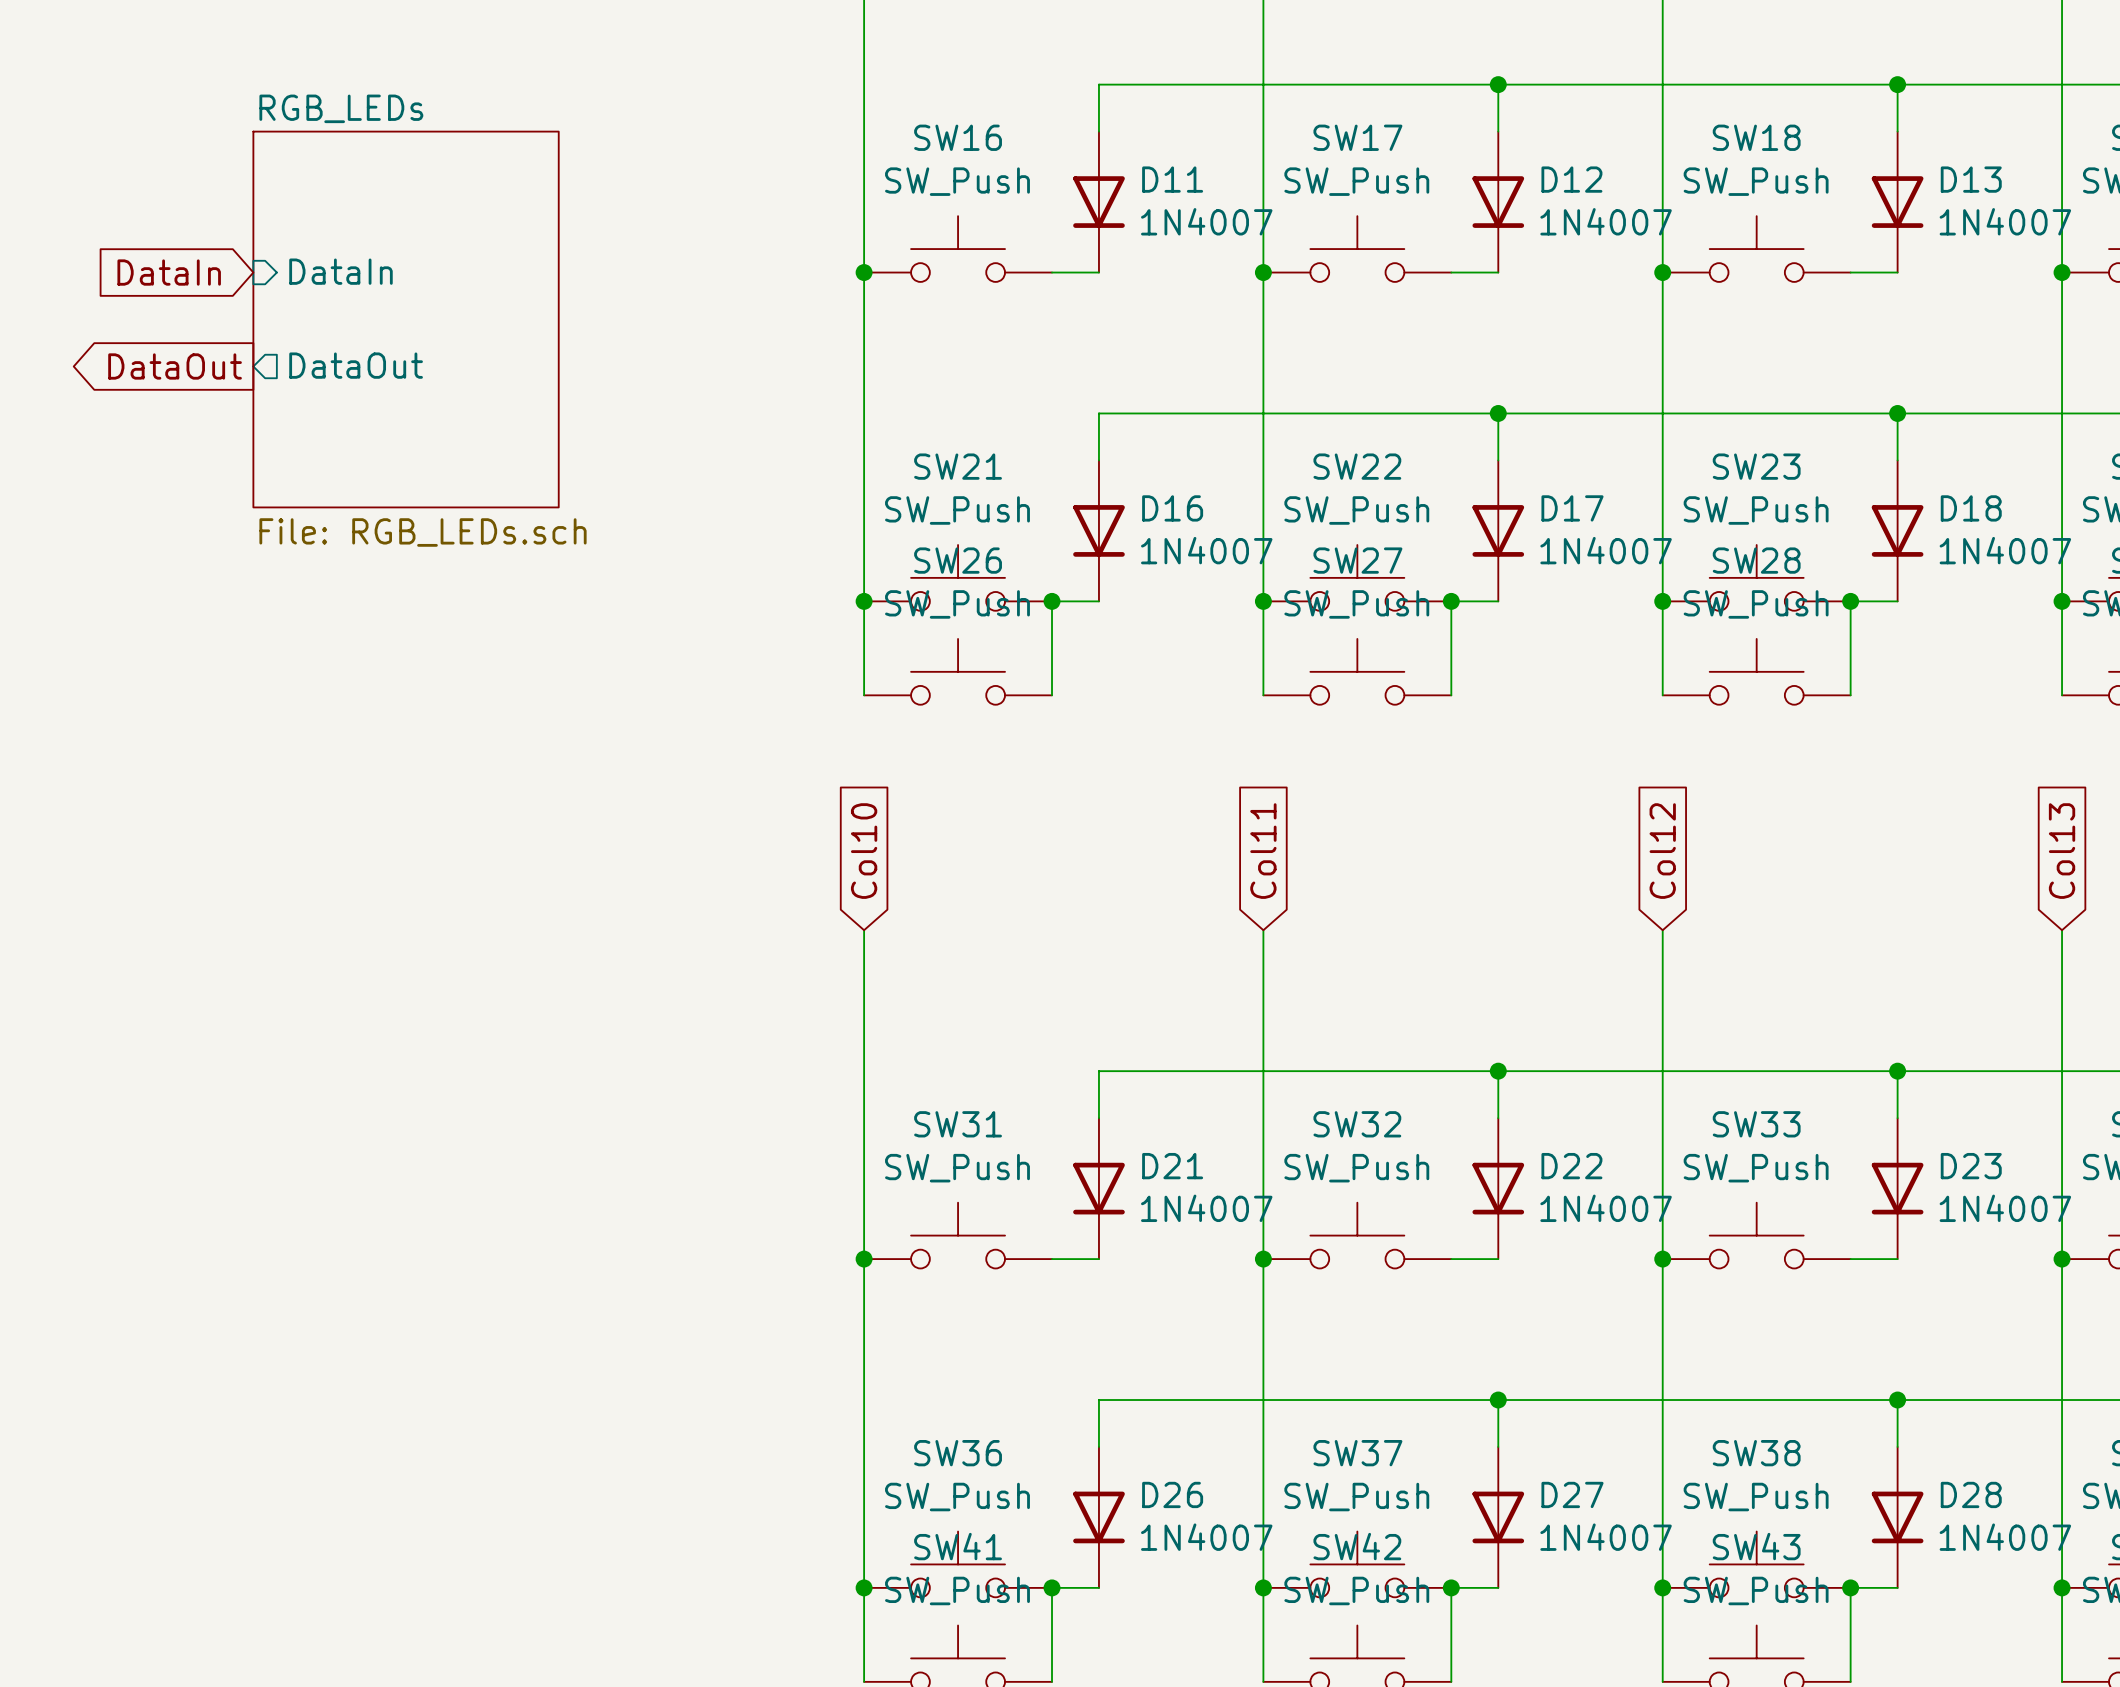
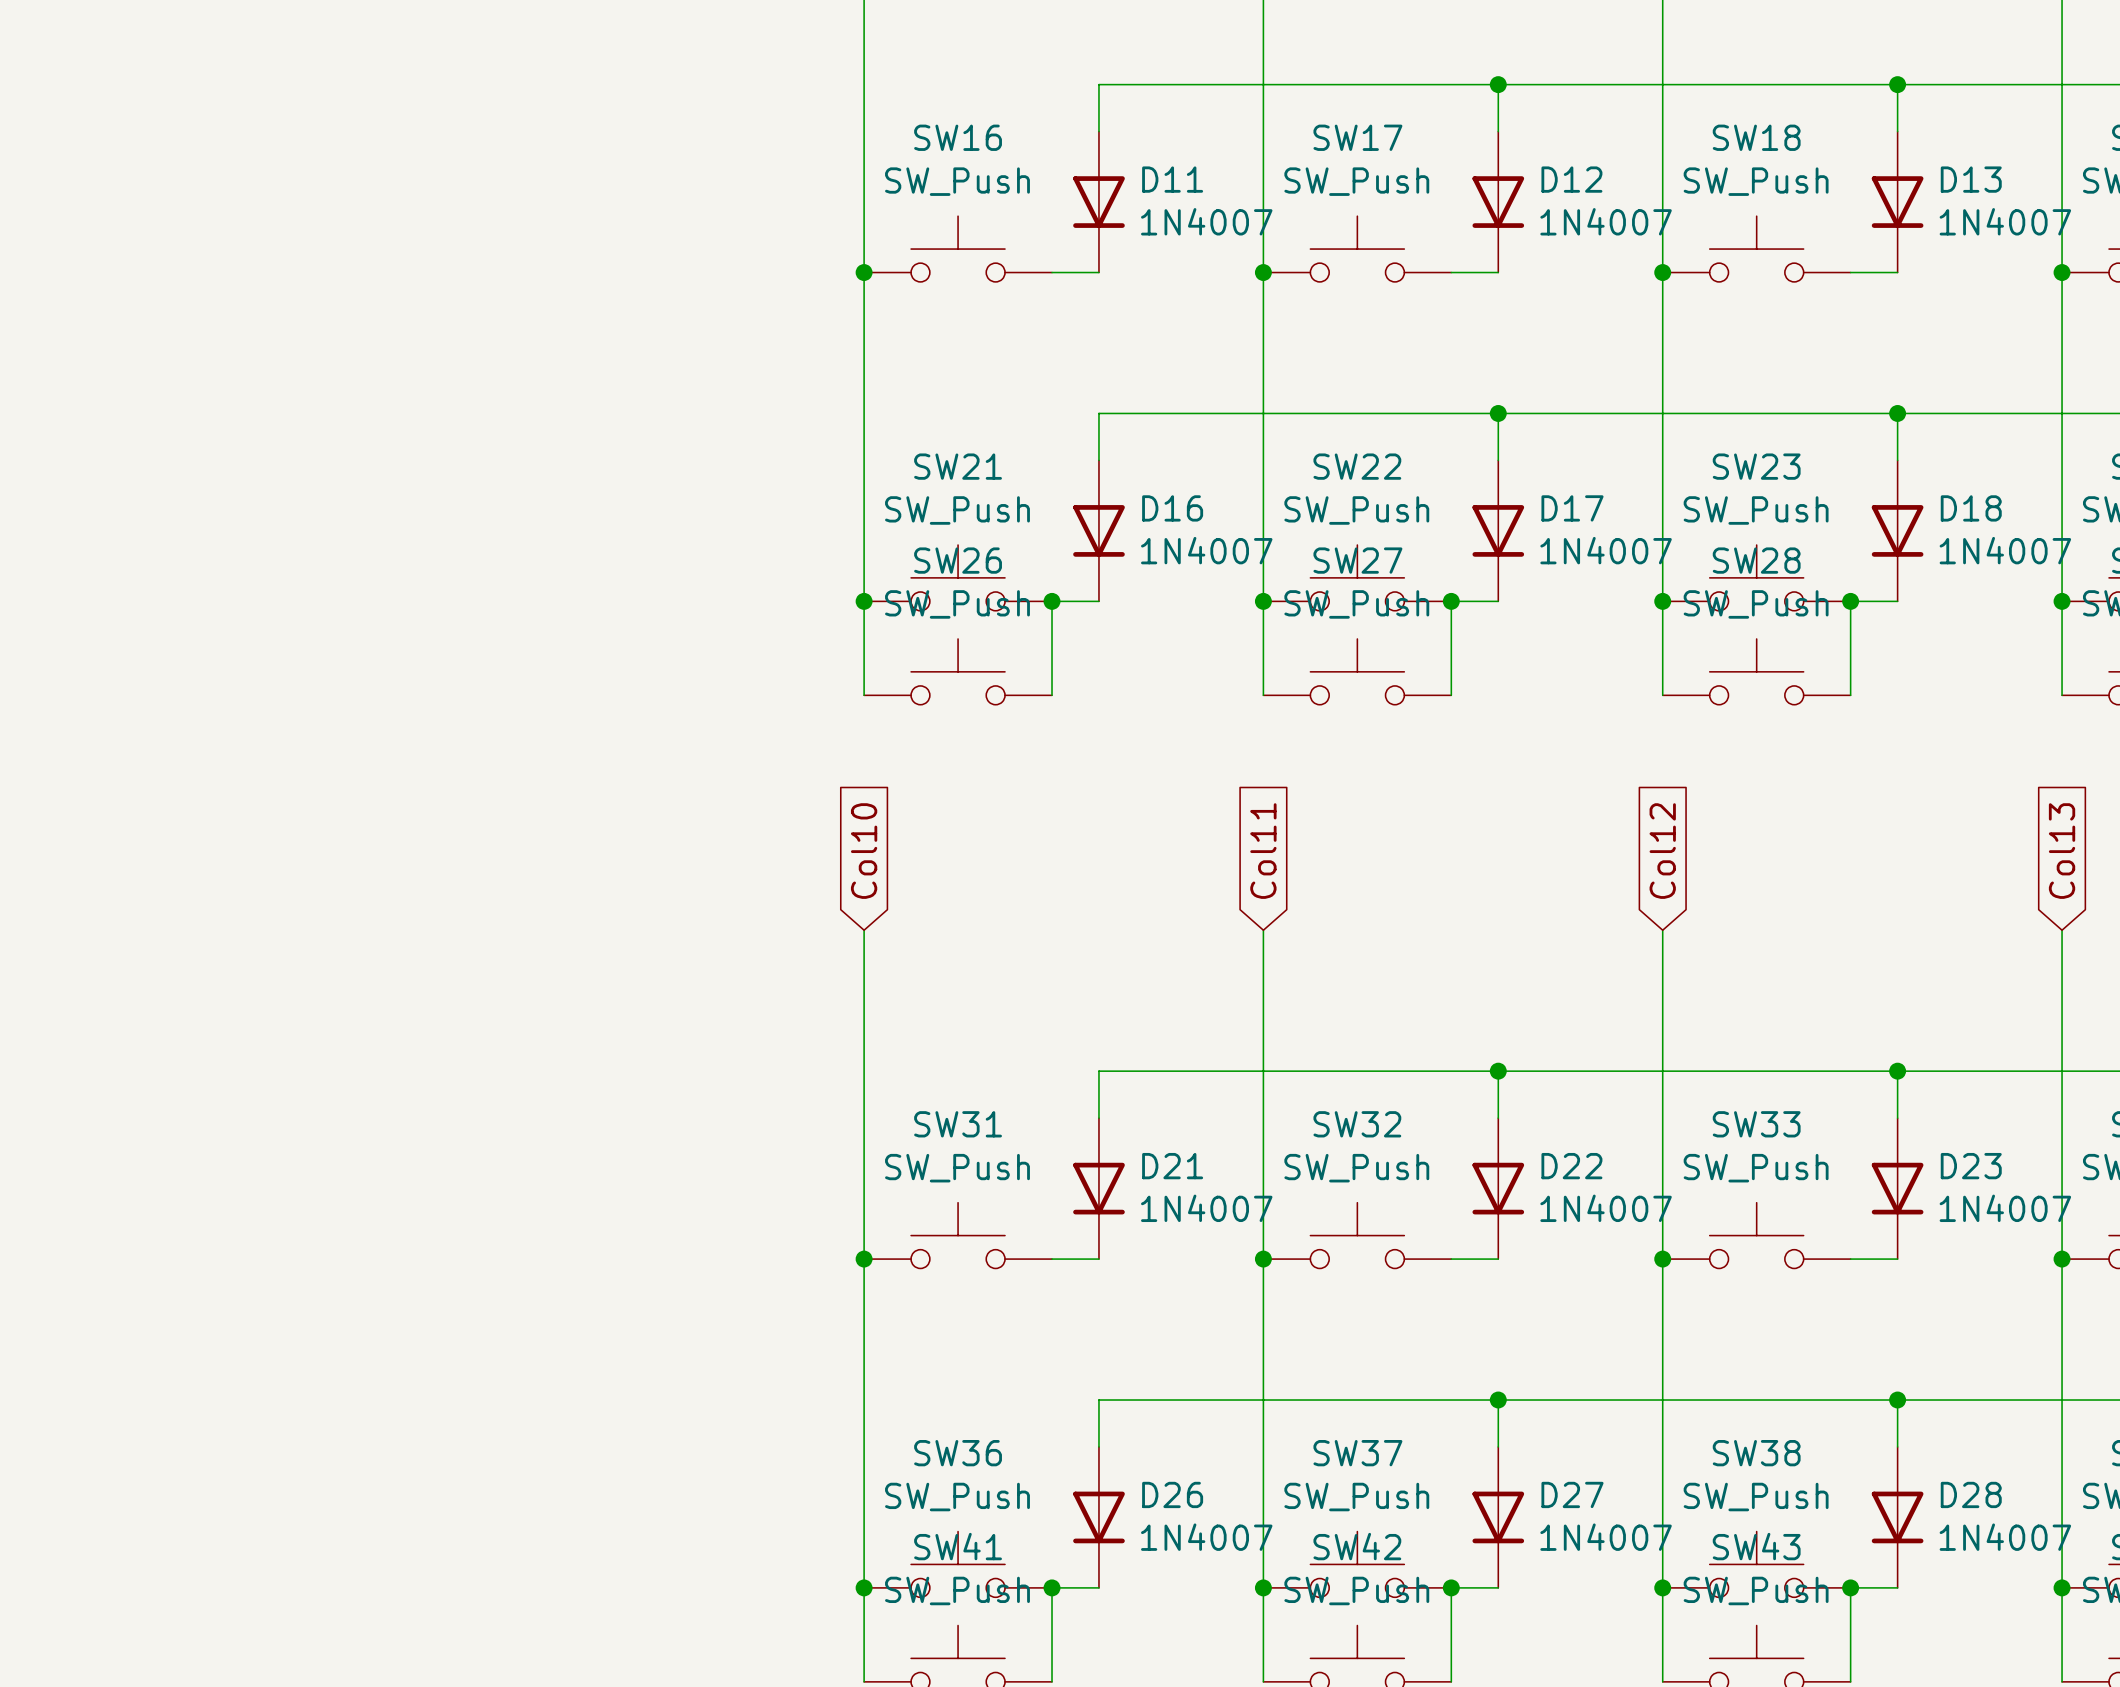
sheet pin: DataIn (340, 271) -> none
global label: DataIn (169, 272) -> none
sheet RGB_LEDs: File: RGB_LEDs.sch (406, 319) -> none
sheet pin: DataOut (356, 365) -> none
global label: DataOut (175, 366) -> none

